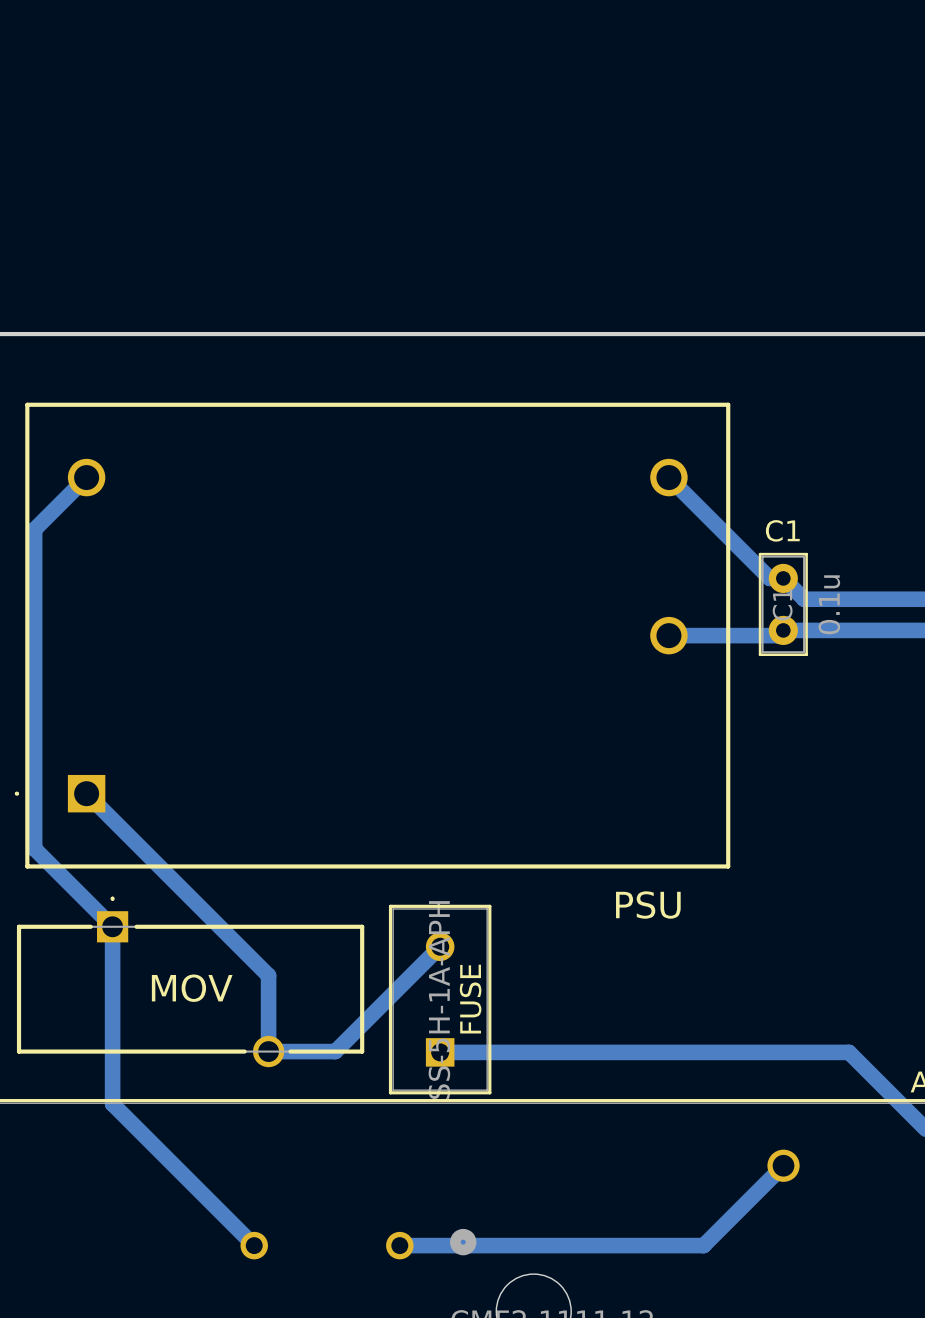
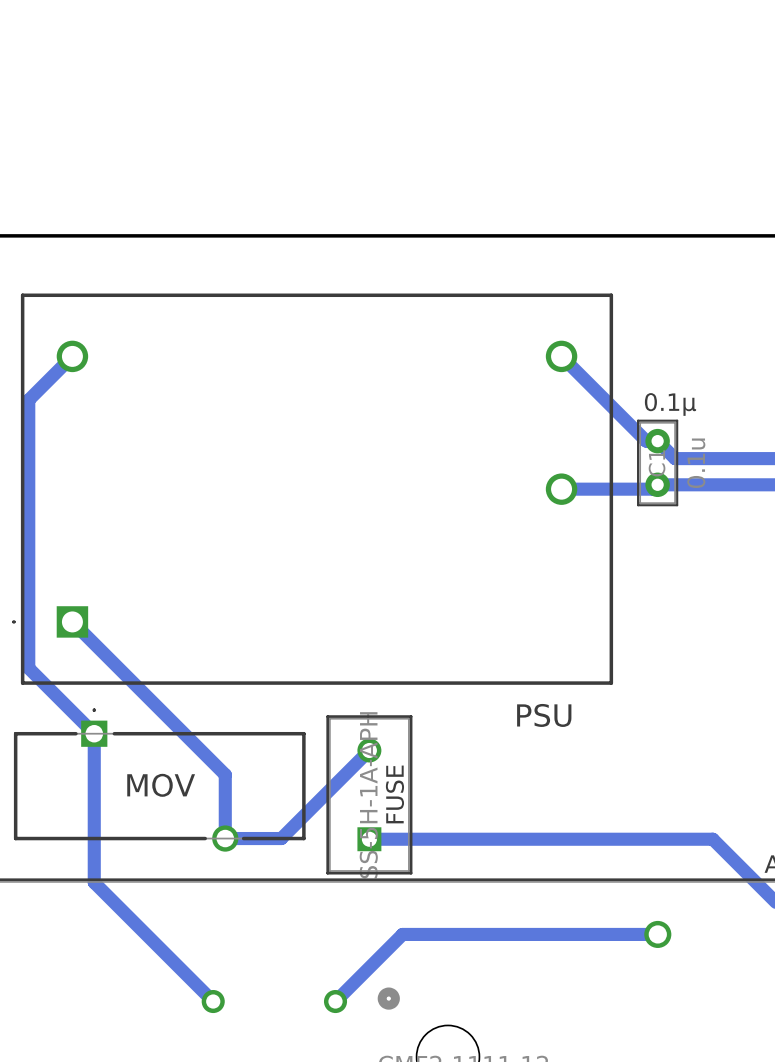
text: C1 (782, 530) -> none
text: none -> 0.1µ (670, 404)
bottom track: (783, 1165) (703, 1245) (399, 1245) -> (657, 934) (402, 934) (335, 1001)

